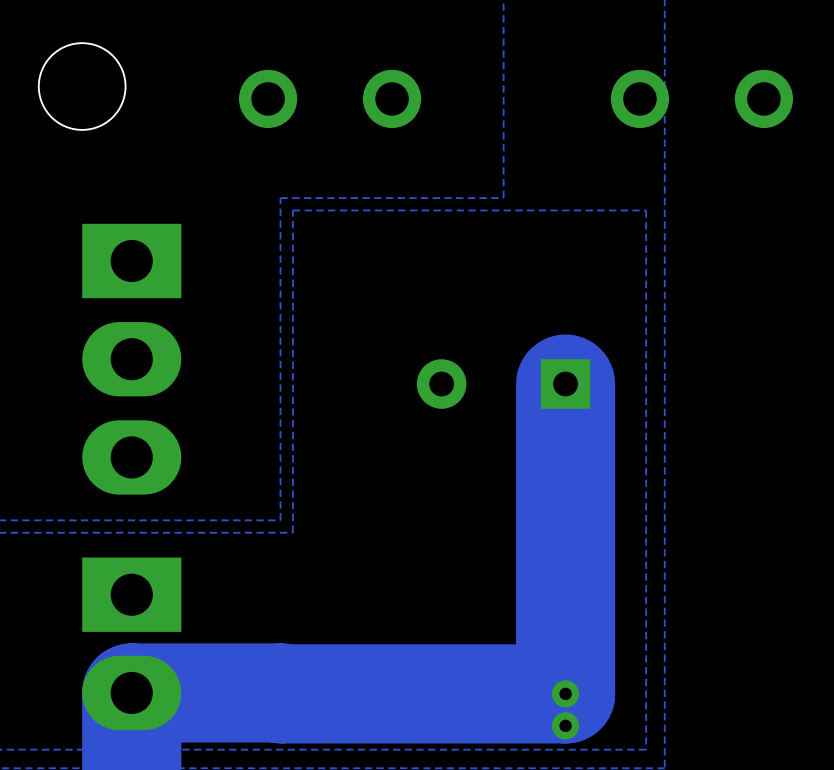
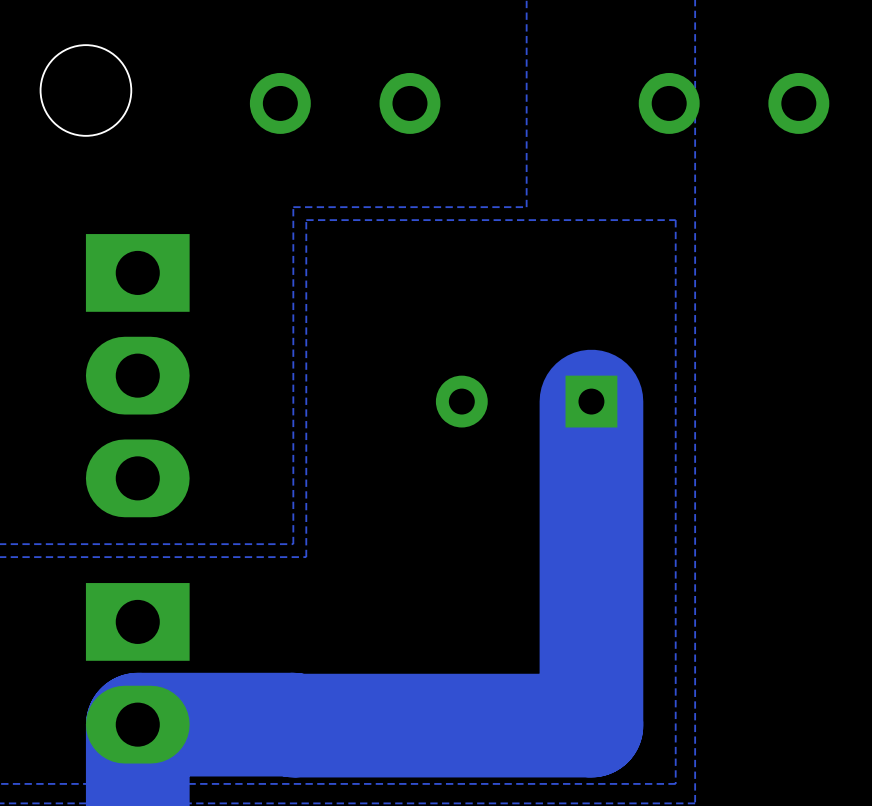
via: (565, 693) -> none
via: (565, 725) -> none

